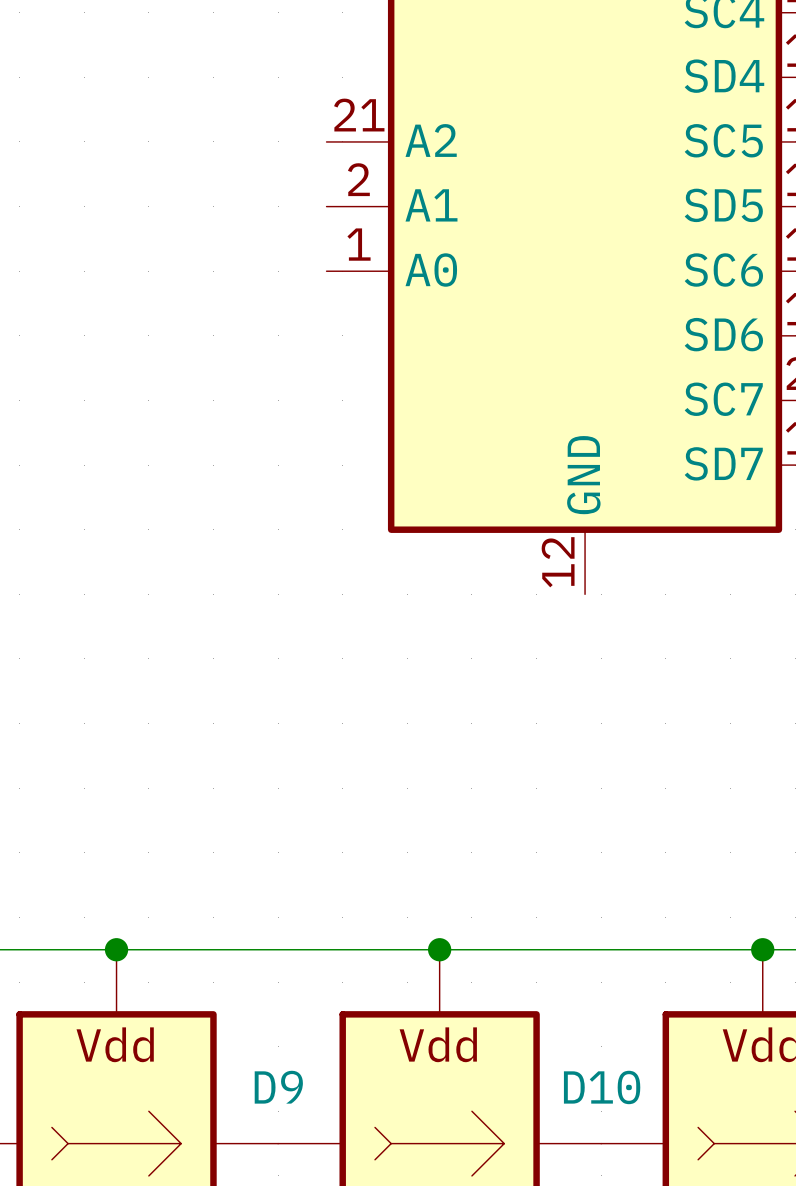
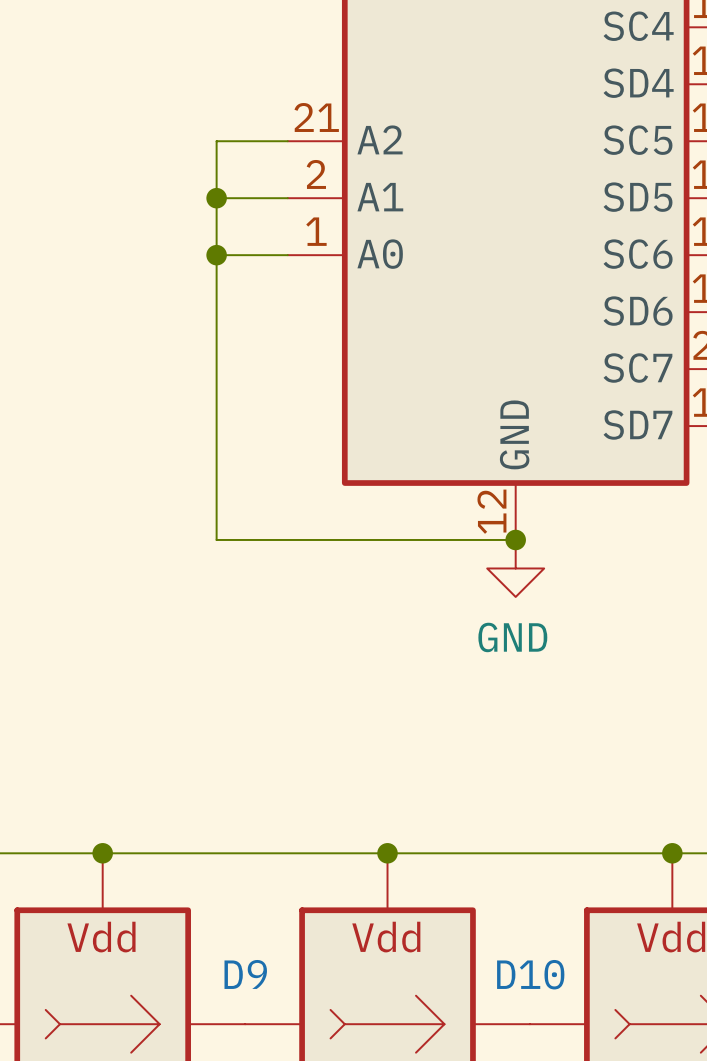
wire: none -> (287, 141) (216, 141) (216, 539) (515, 539)
wire: none -> (216, 198) (287, 198)
junction: none -> (216, 198)
wire: none -> (216, 255) (287, 255)
junction: none -> (216, 255)
junction: none -> (515, 539)
power symbol: none -> GND (515, 568)

